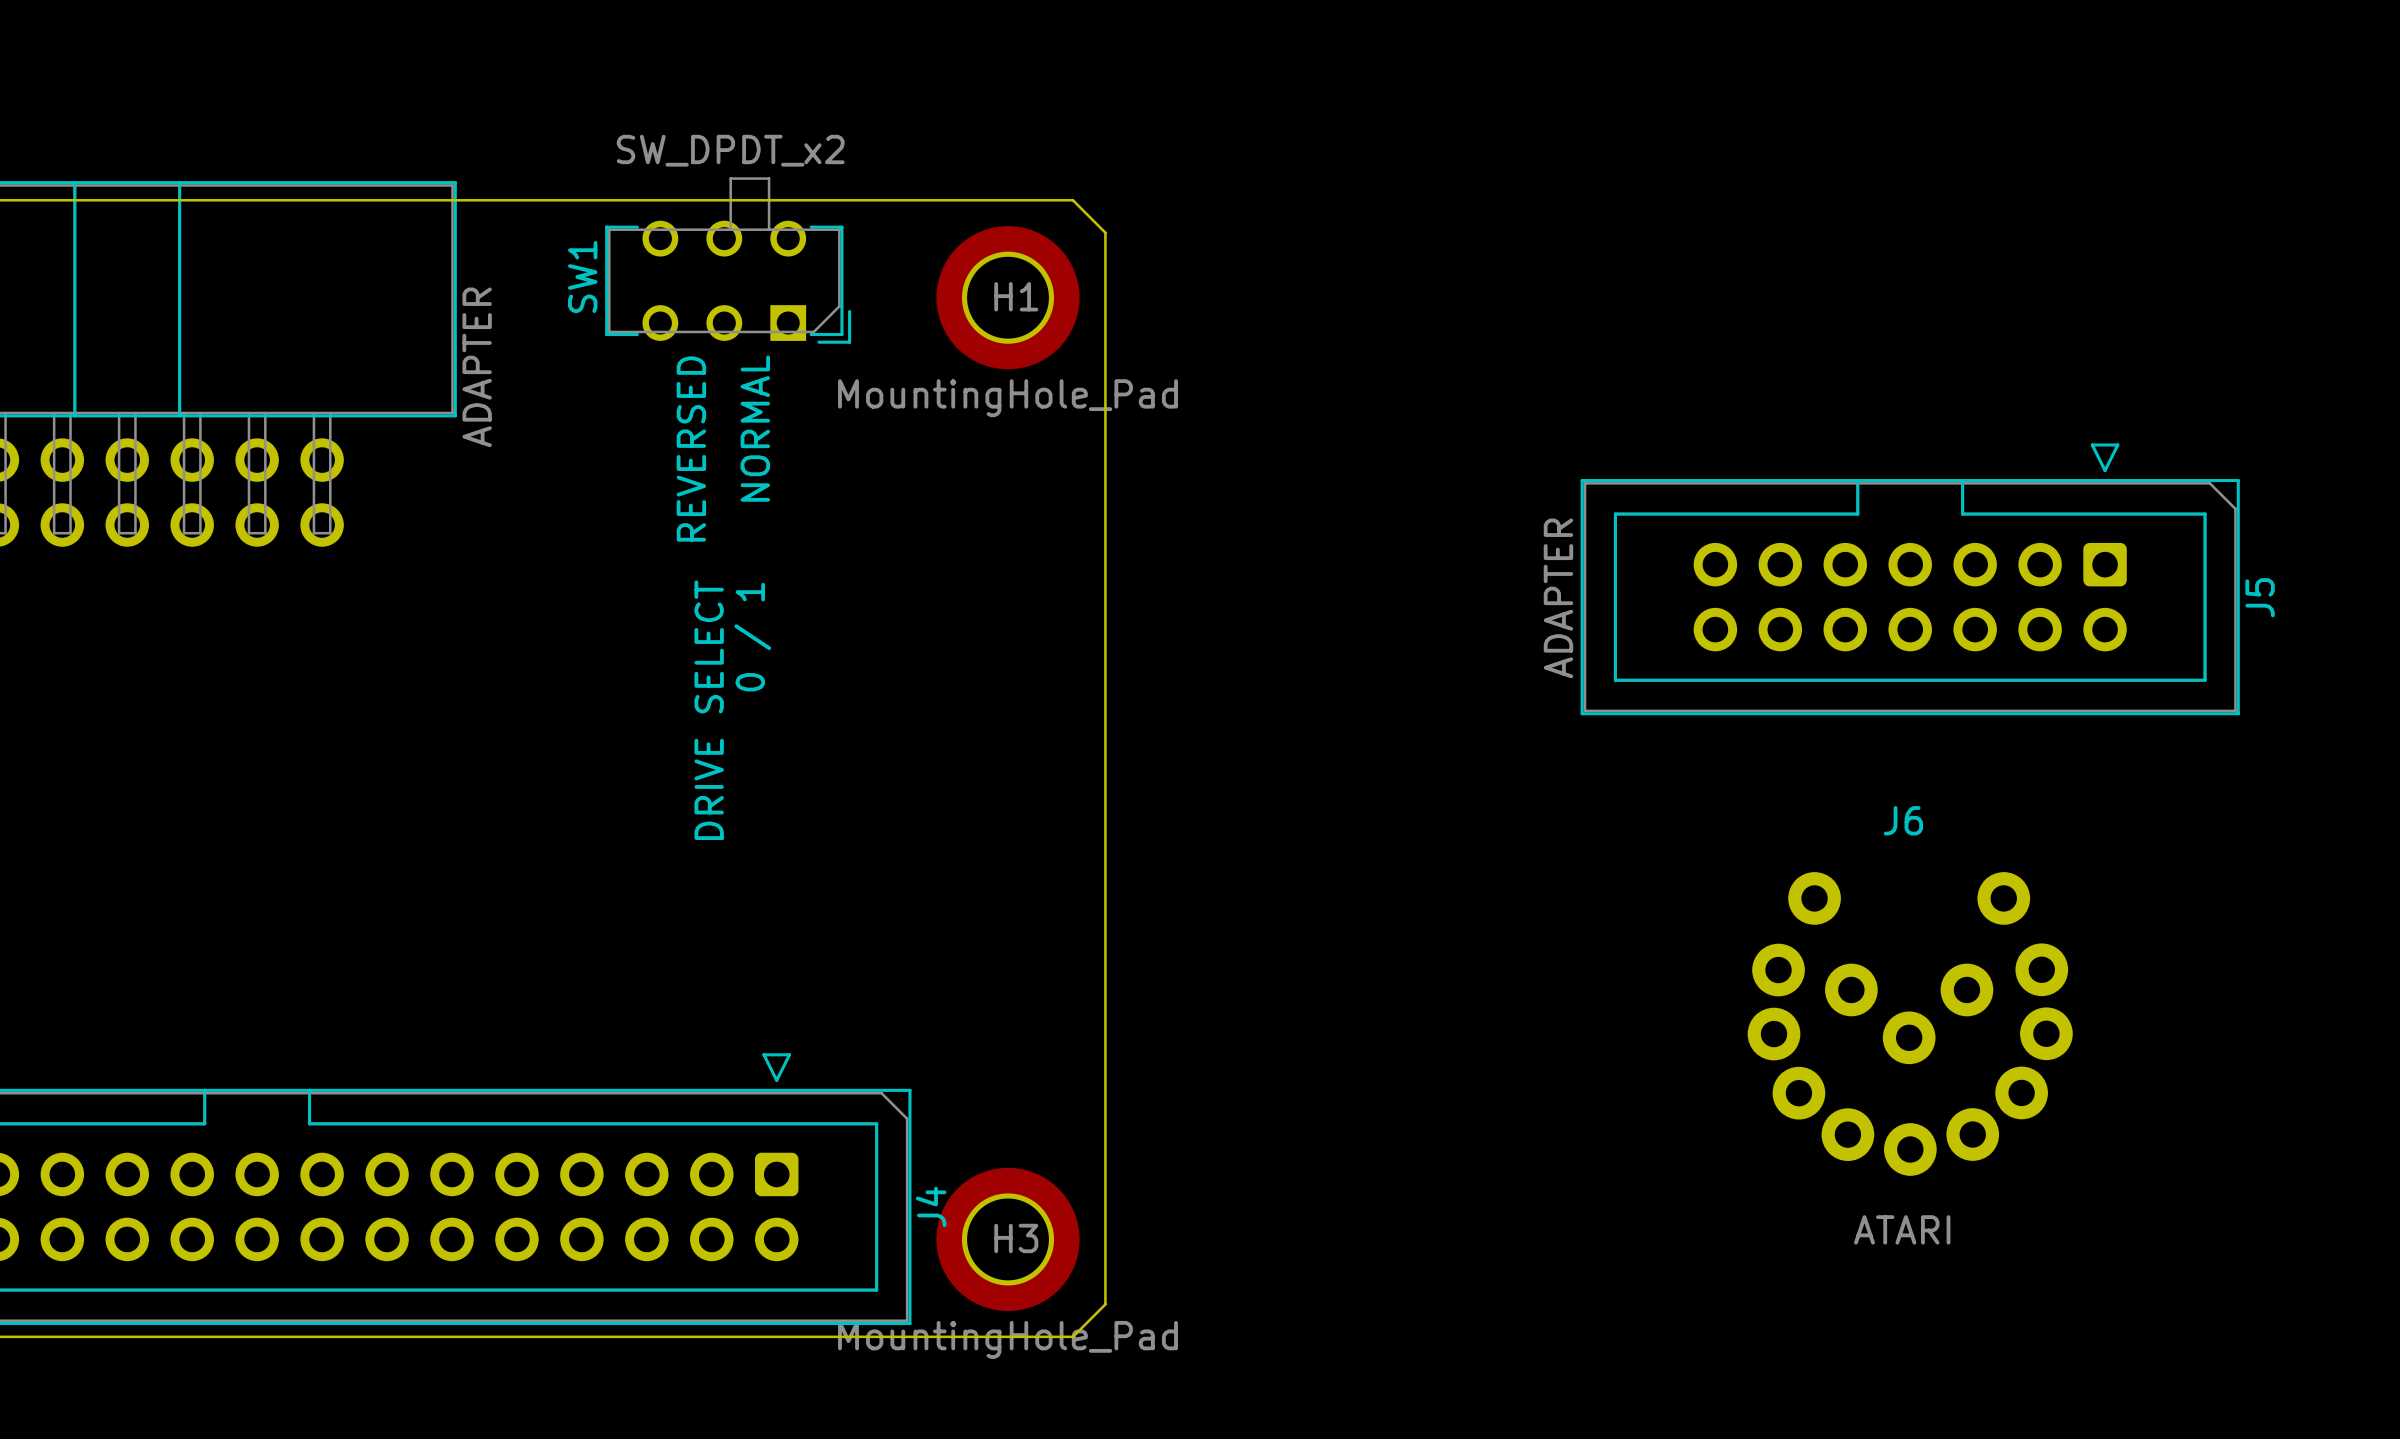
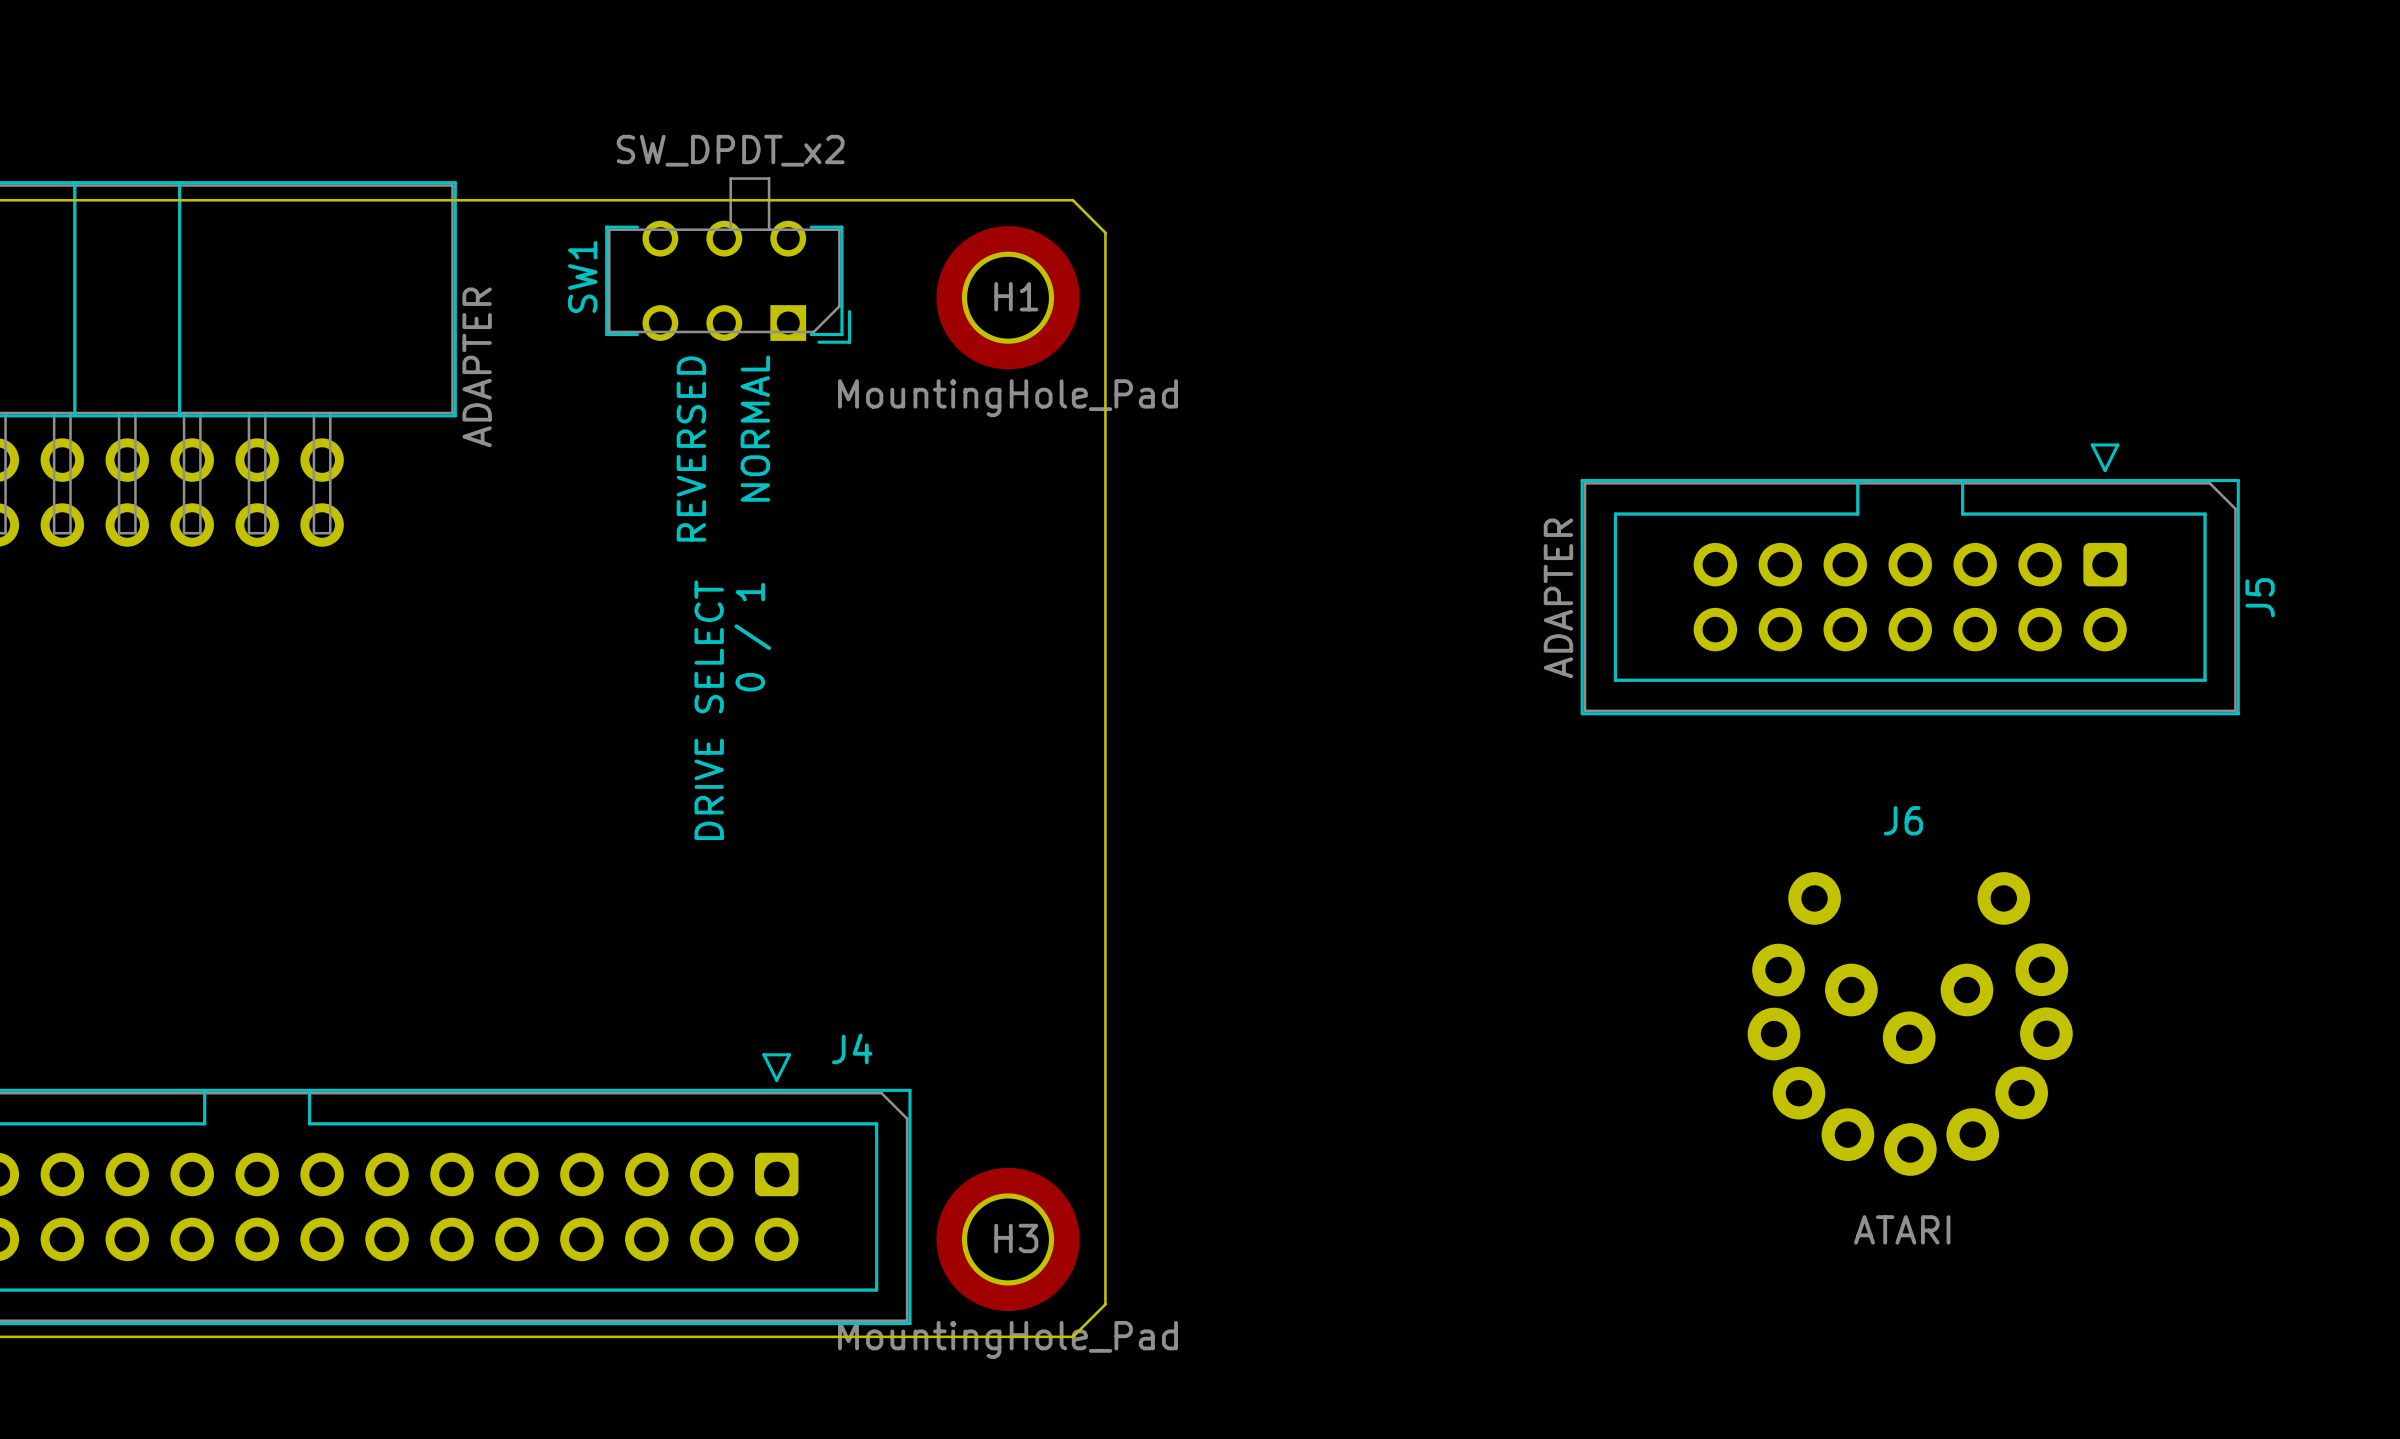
J4 name rotation: 0° (931, 1206) -> 90° clockwise (852, 1048)
J4 name position: J4 (931, 1206) -> J4 (852, 1048)

